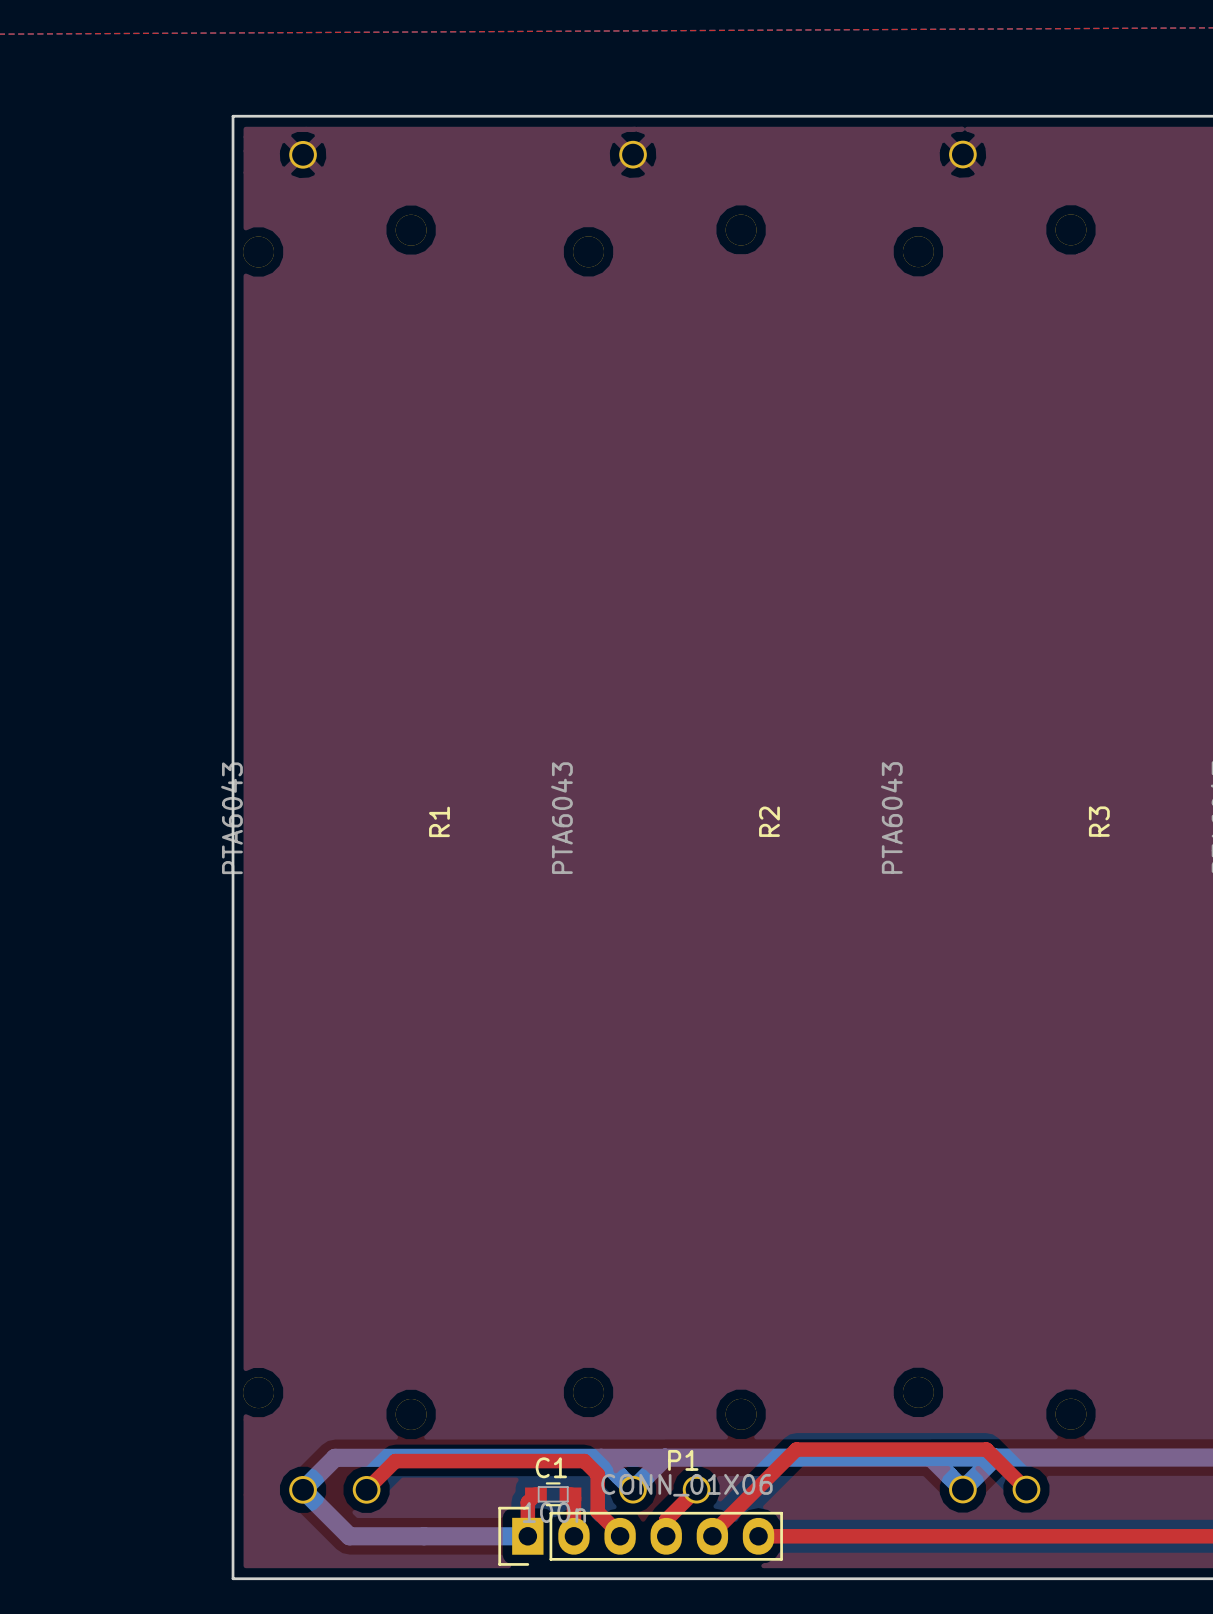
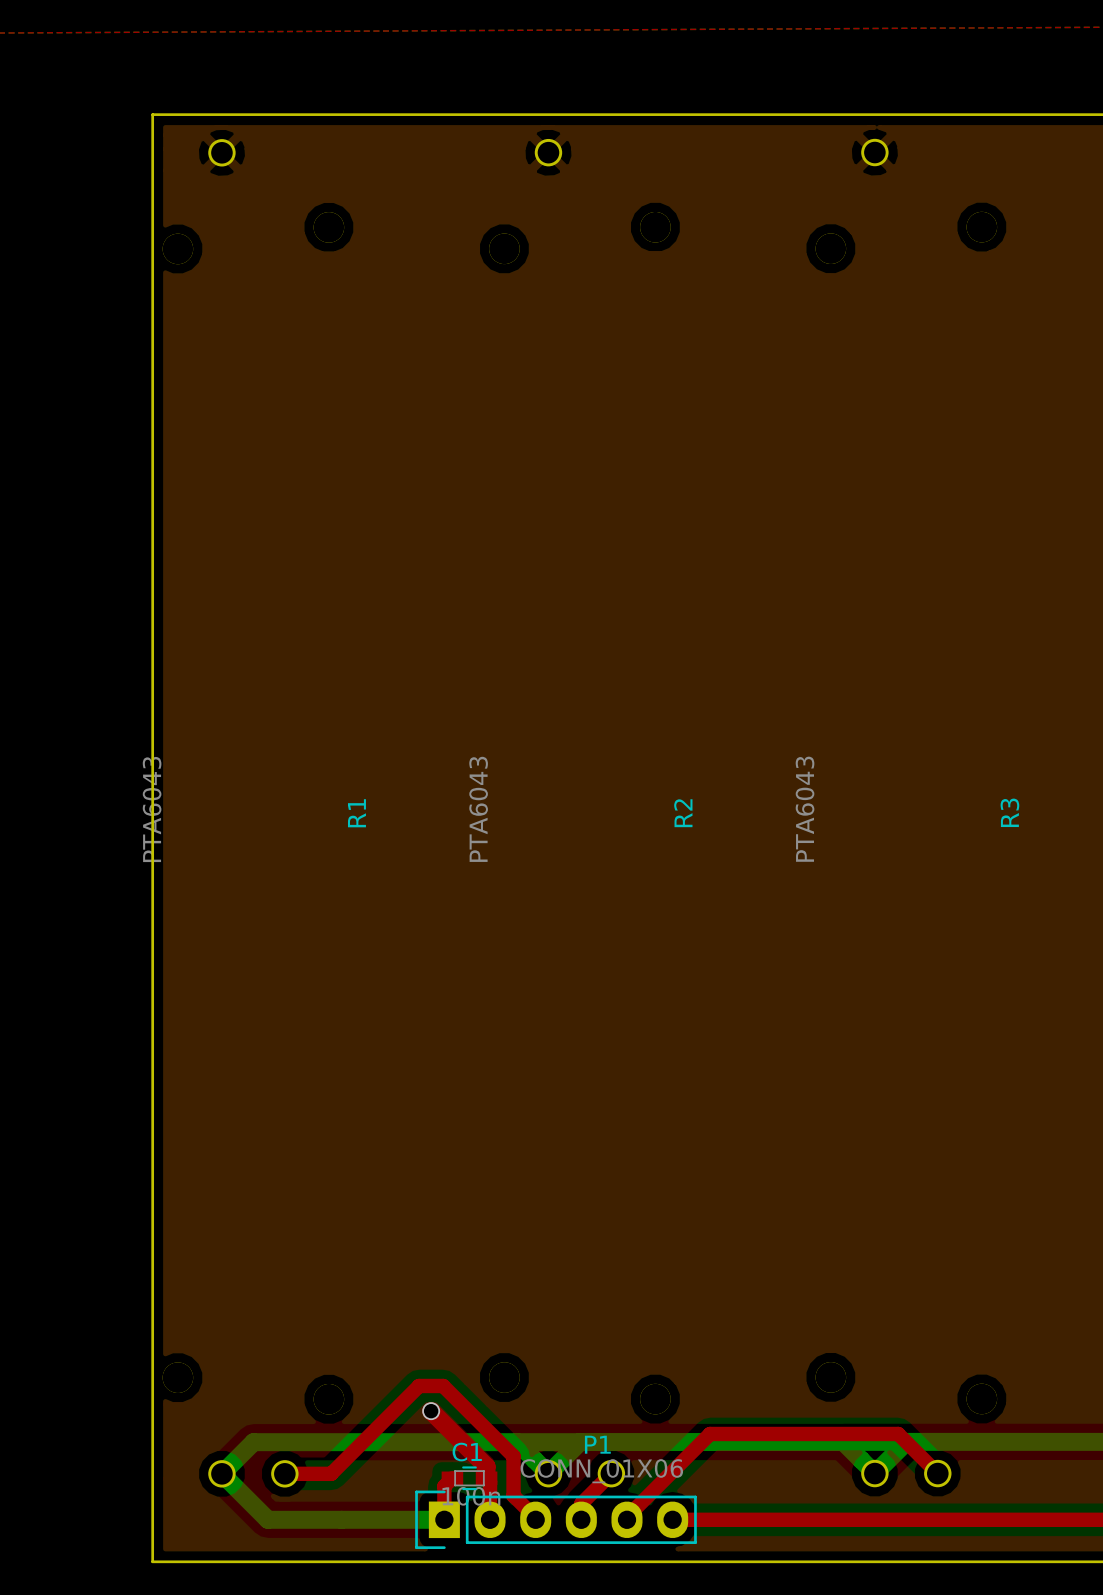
top track: none -> (431, 1411) (486, 1466) (486, 1478)
via: none -> (431, 1411)
top track: (597, 1474) (584, 1461) (395, 1461) (366, 1489) -> (513, 1458) (513, 1456) (443, 1385) (419, 1385) (331, 1473) (284, 1473)

